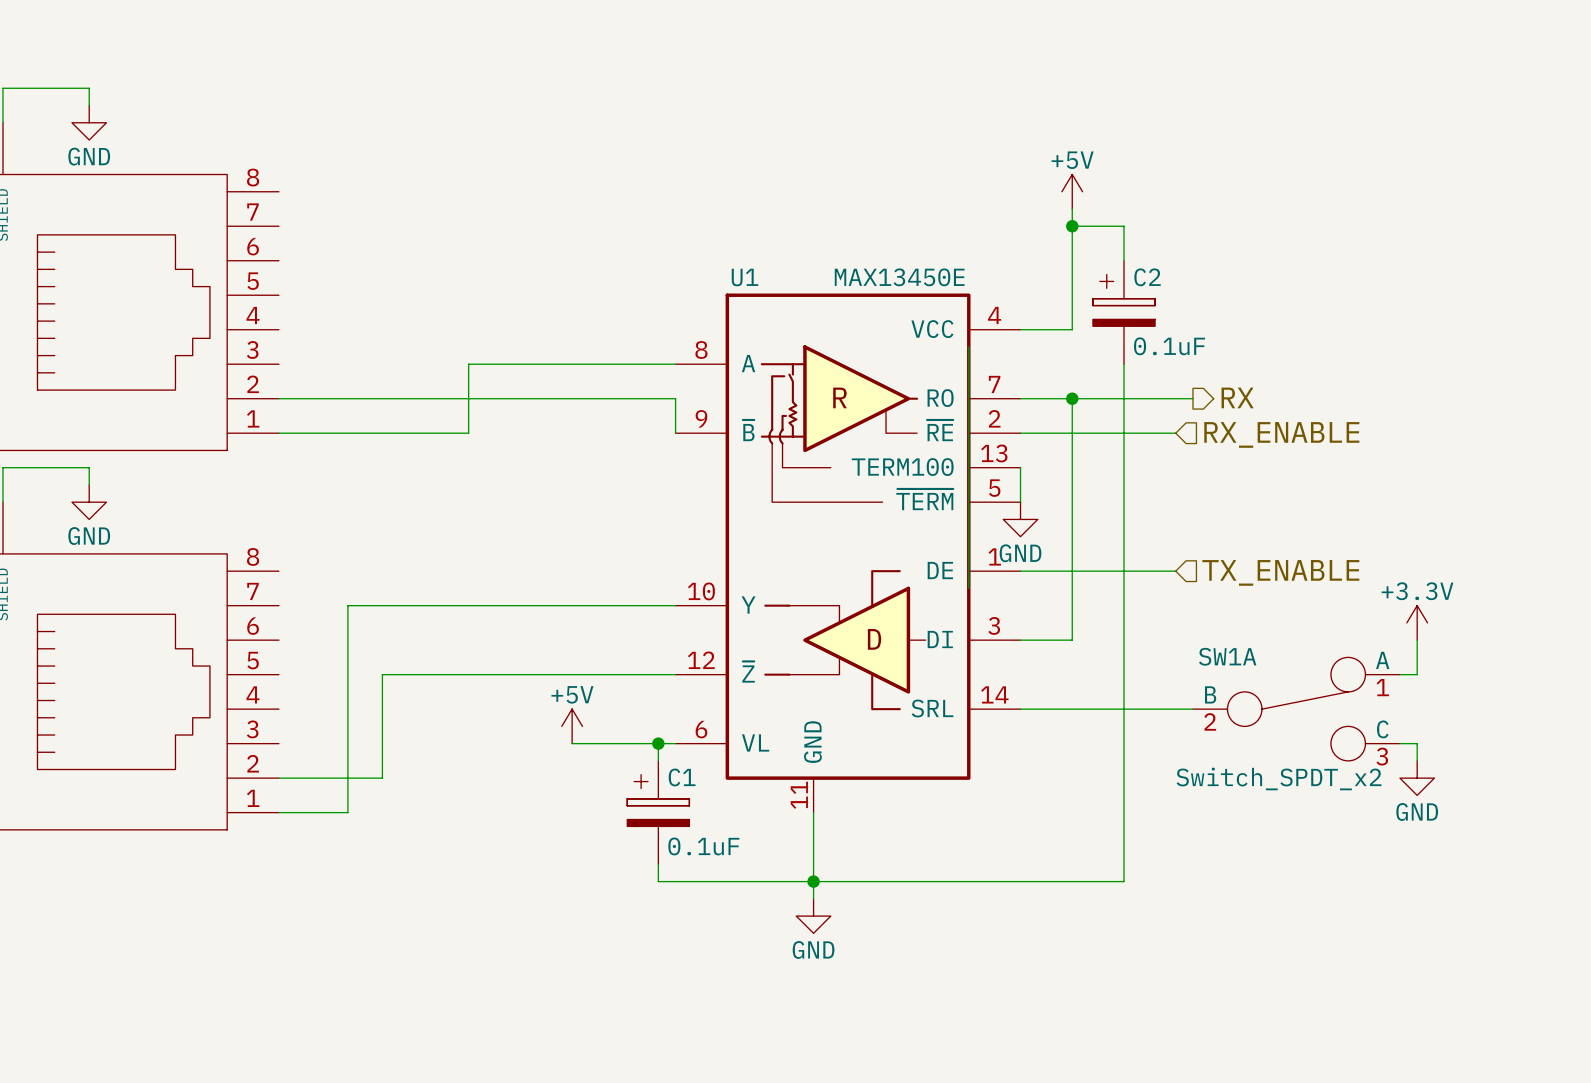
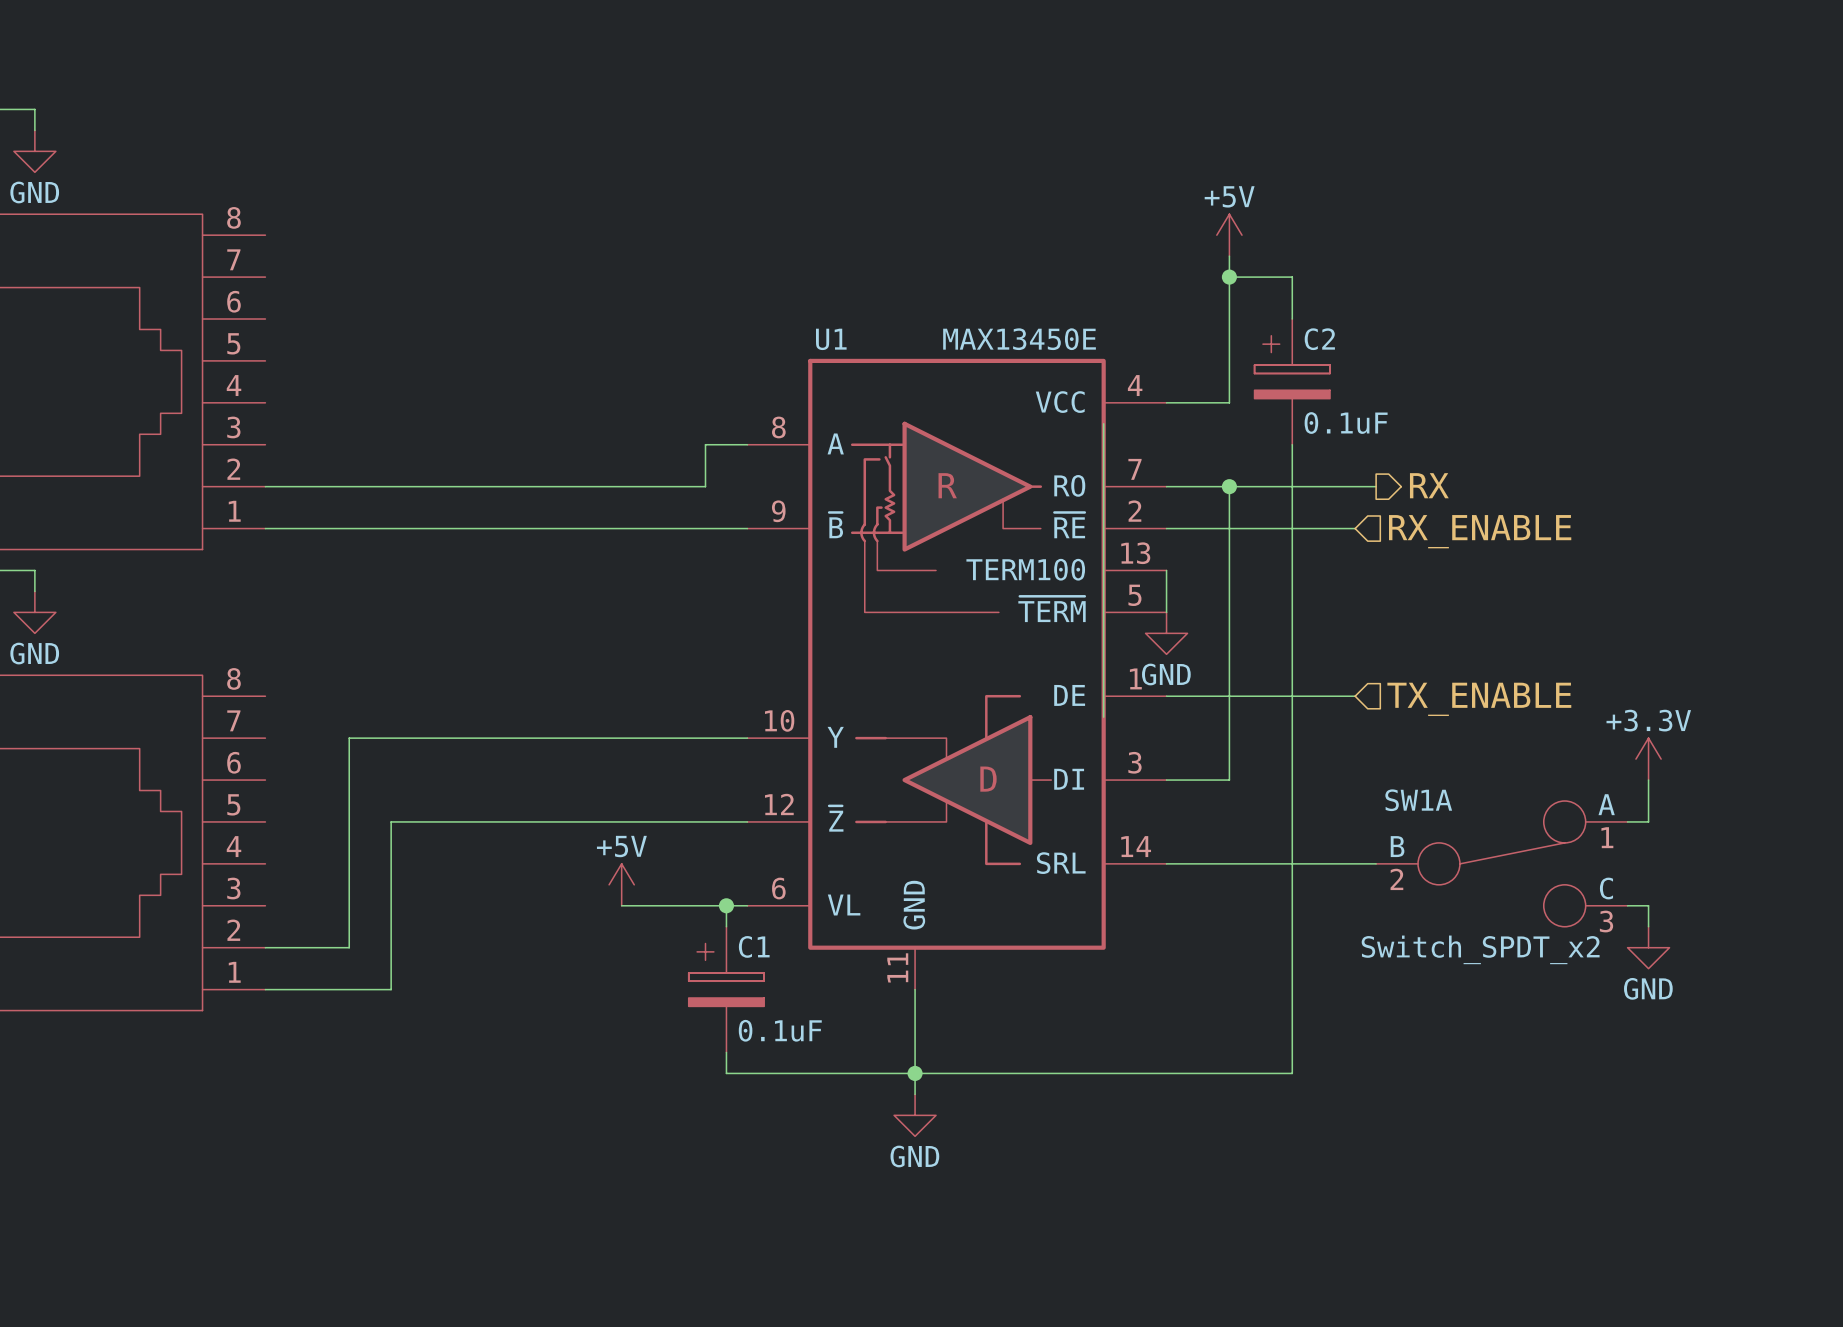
wire: (641, 364) (468, 364) (468, 433) -> (747, 528) (495, 528)
wire: (641, 398) (675, 398) (675, 433) -> (705, 486) (705, 444)
wire: (382, 778) (347, 778) (347, 812) -> (391, 947) (391, 989) (349, 989)

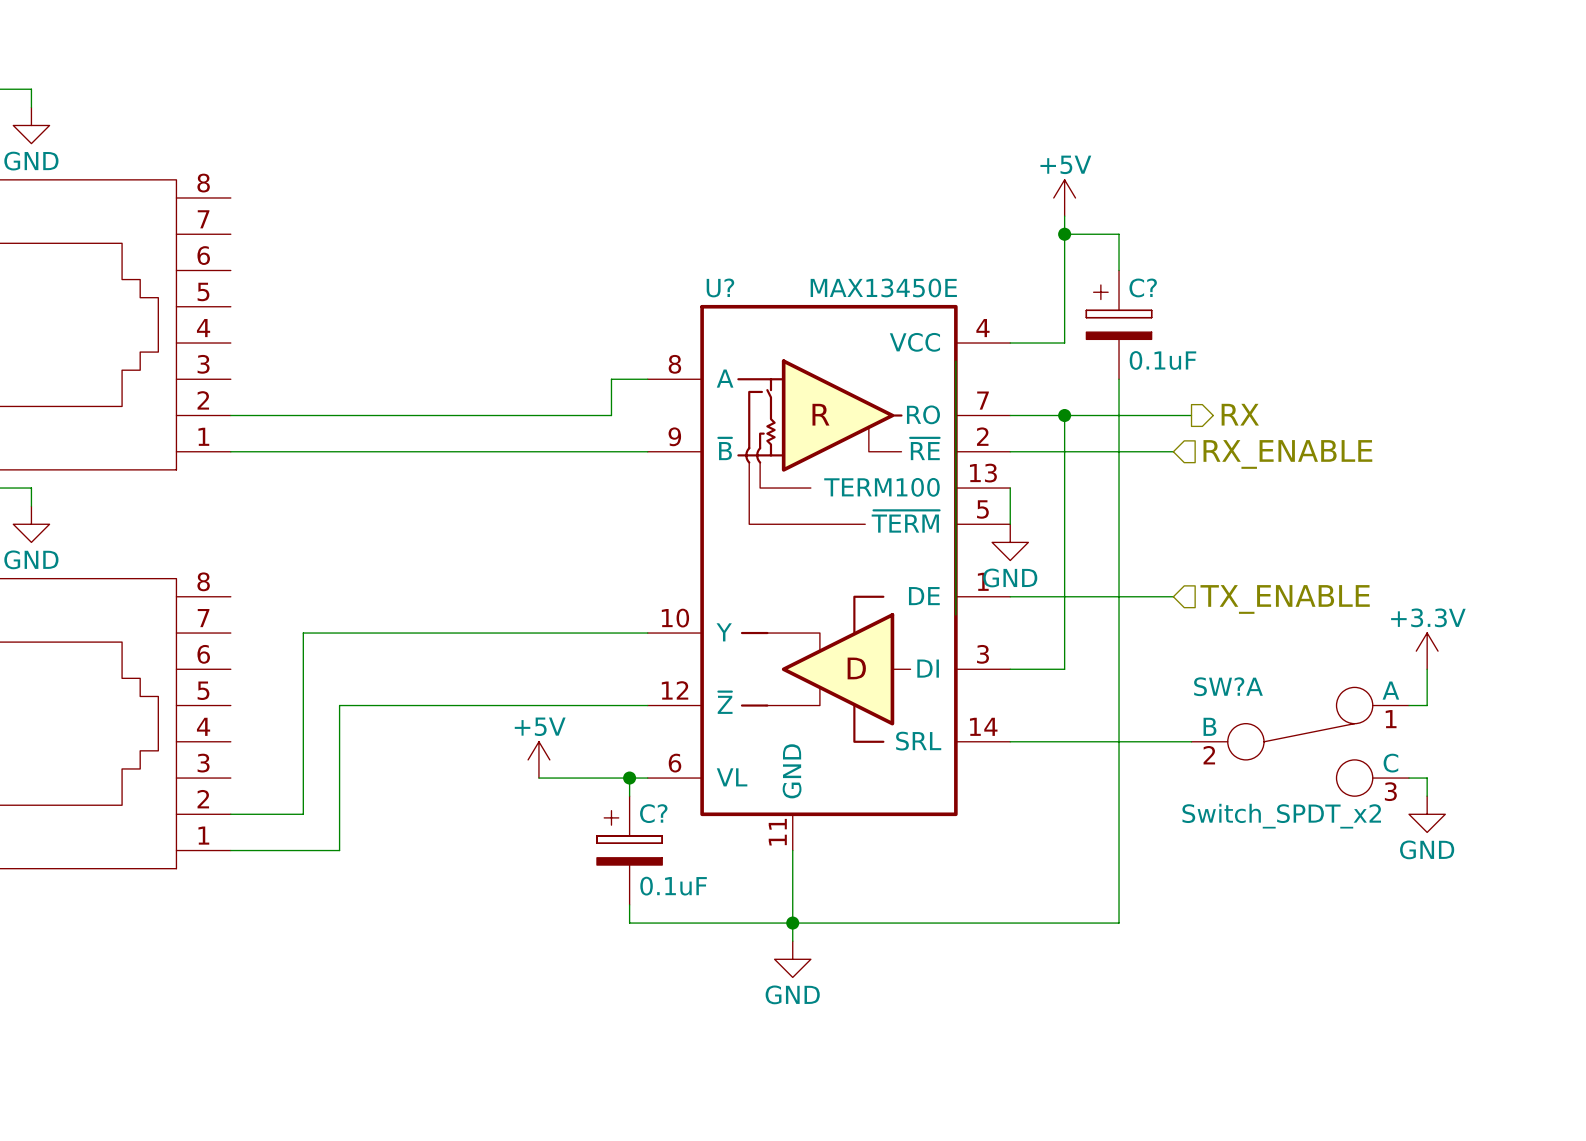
U1 name: U1 (831, 339) -> U? (720, 287)
C2 name: C2 (1319, 339) -> C? (1143, 287)
SW1A name: SW1A (1418, 800) -> SW?A (1228, 686)
C1 name: C1 (754, 946) -> C? (653, 813)

